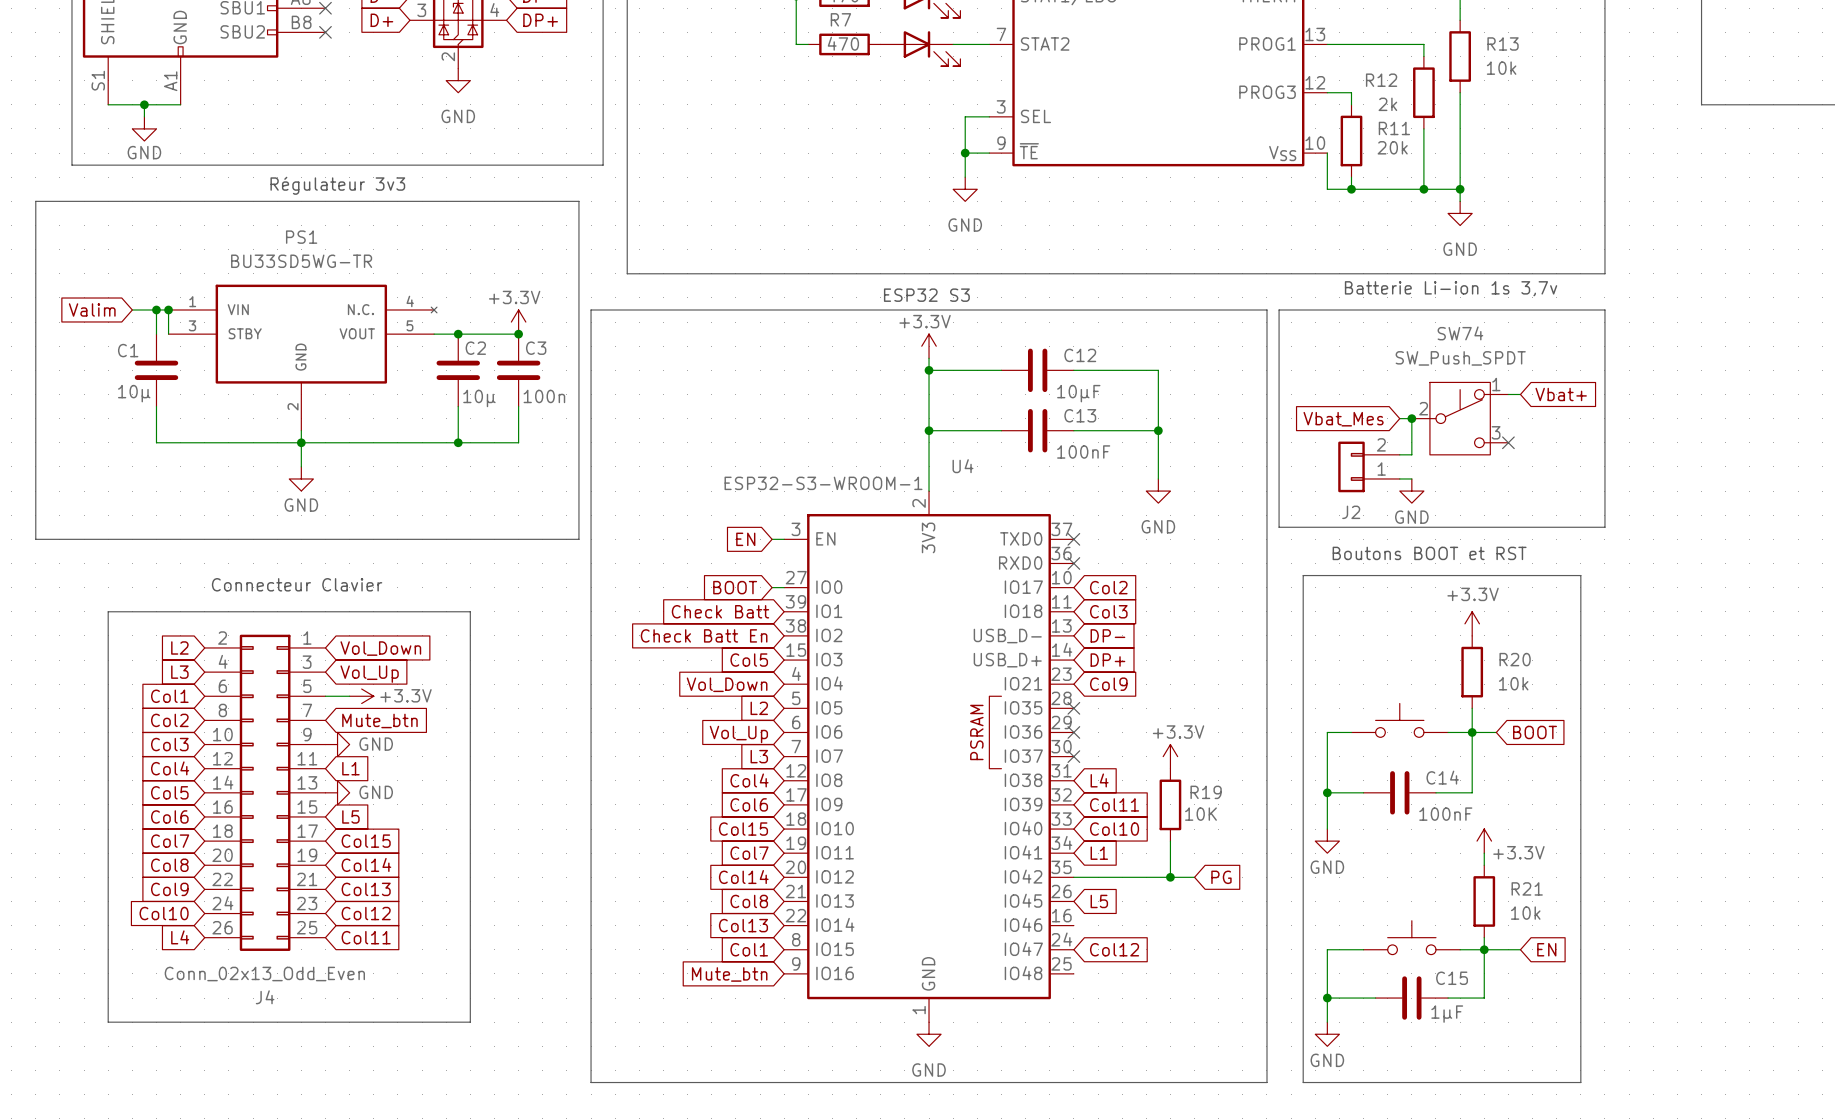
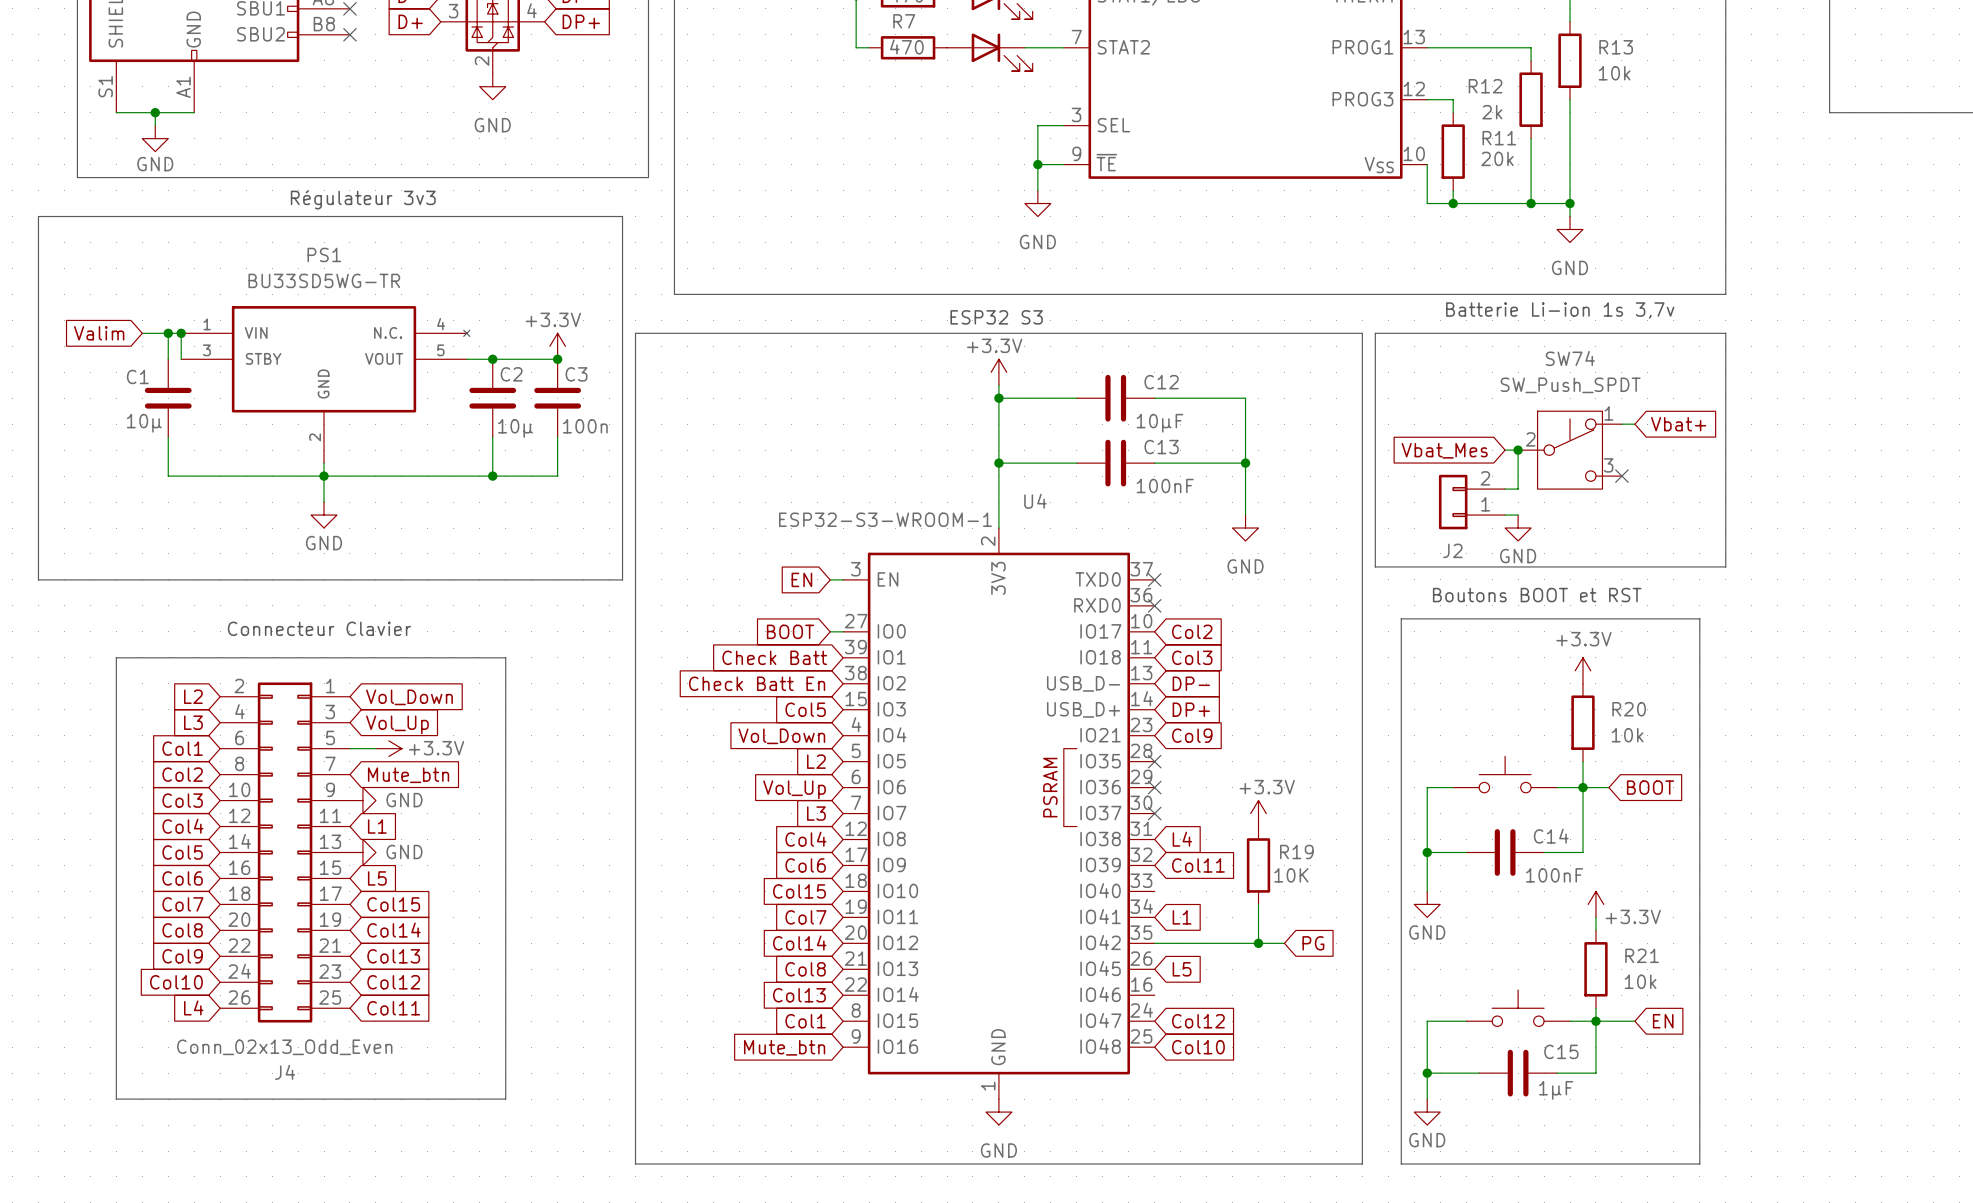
global label position: Col10 (1114, 829) -> Col10 (1198, 1047)

